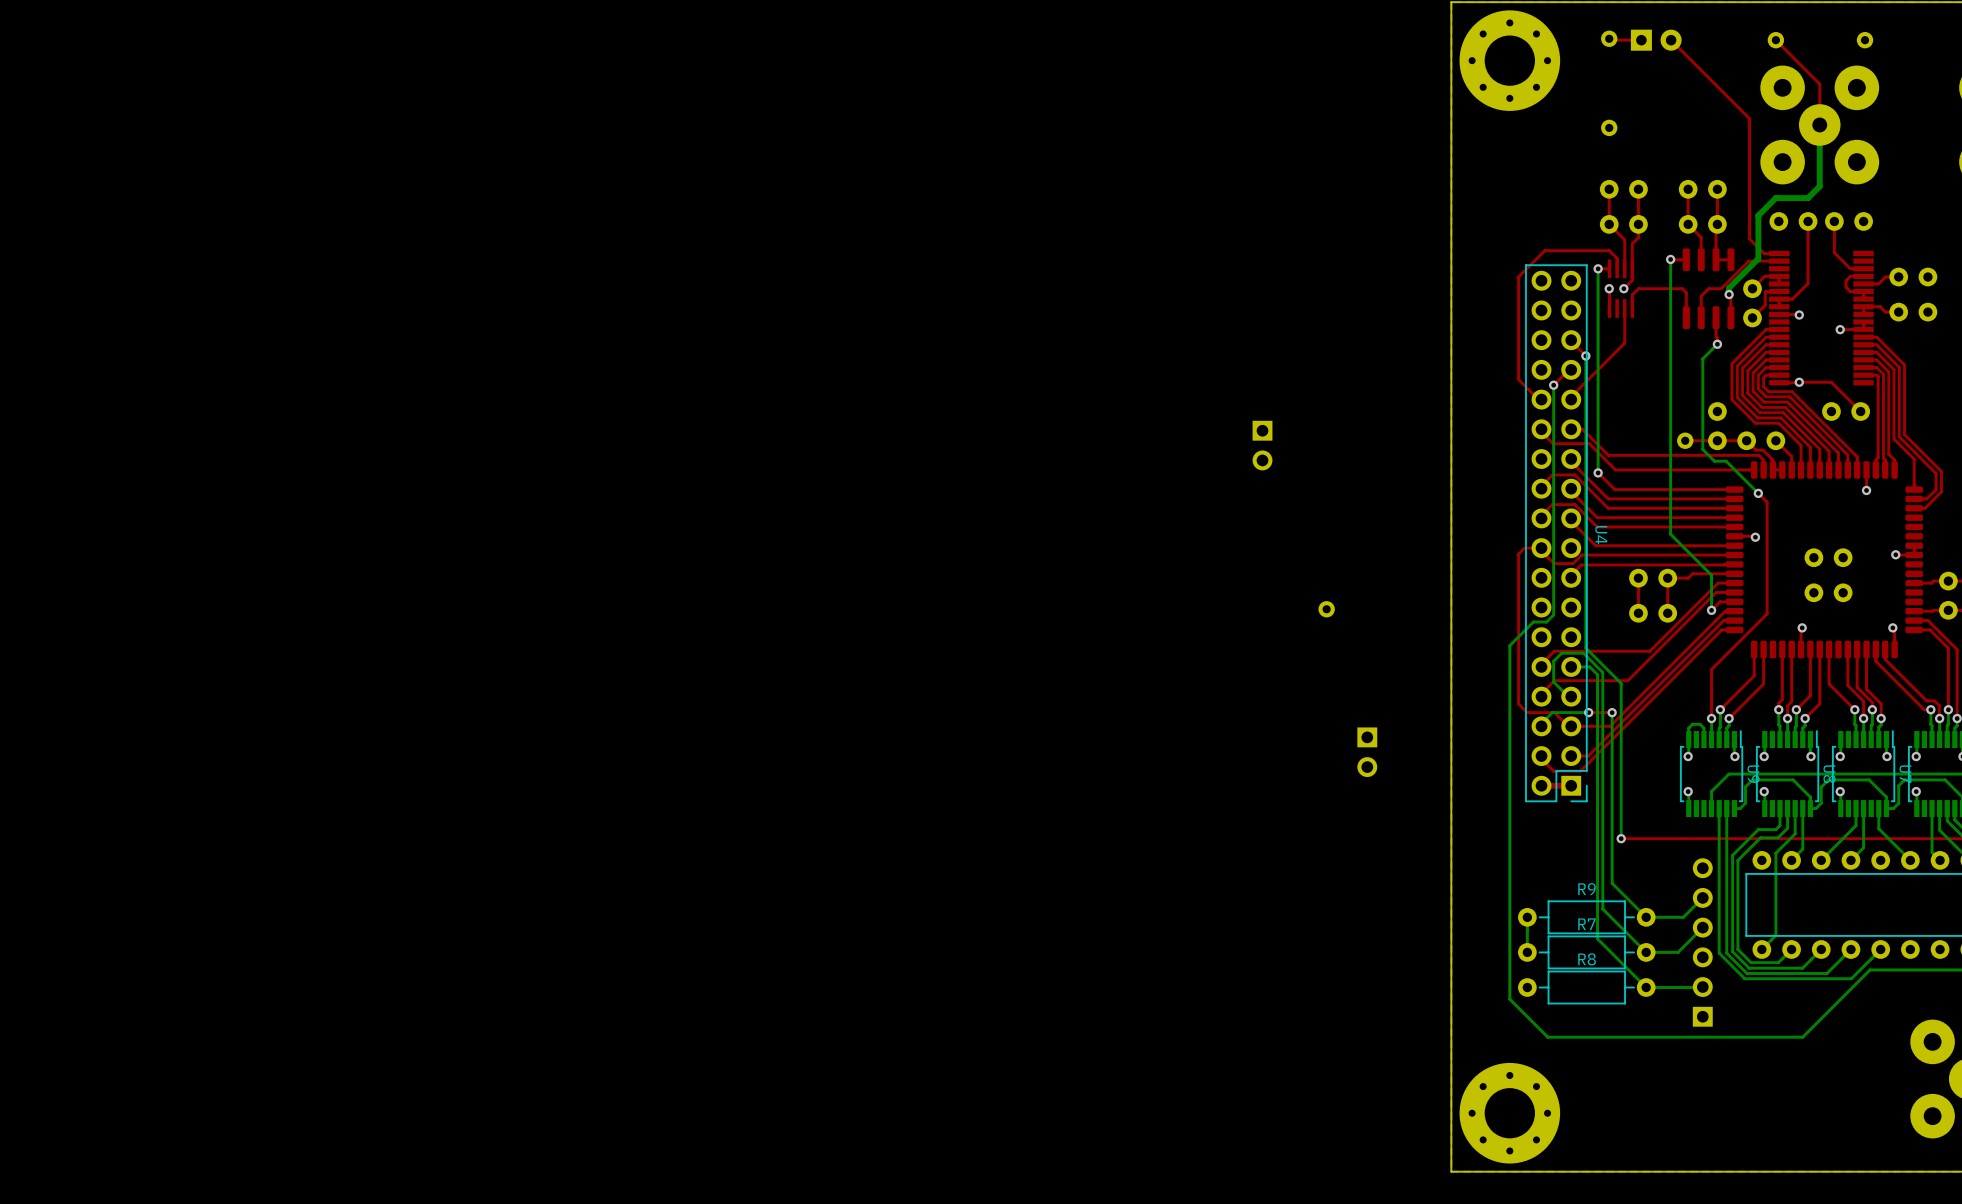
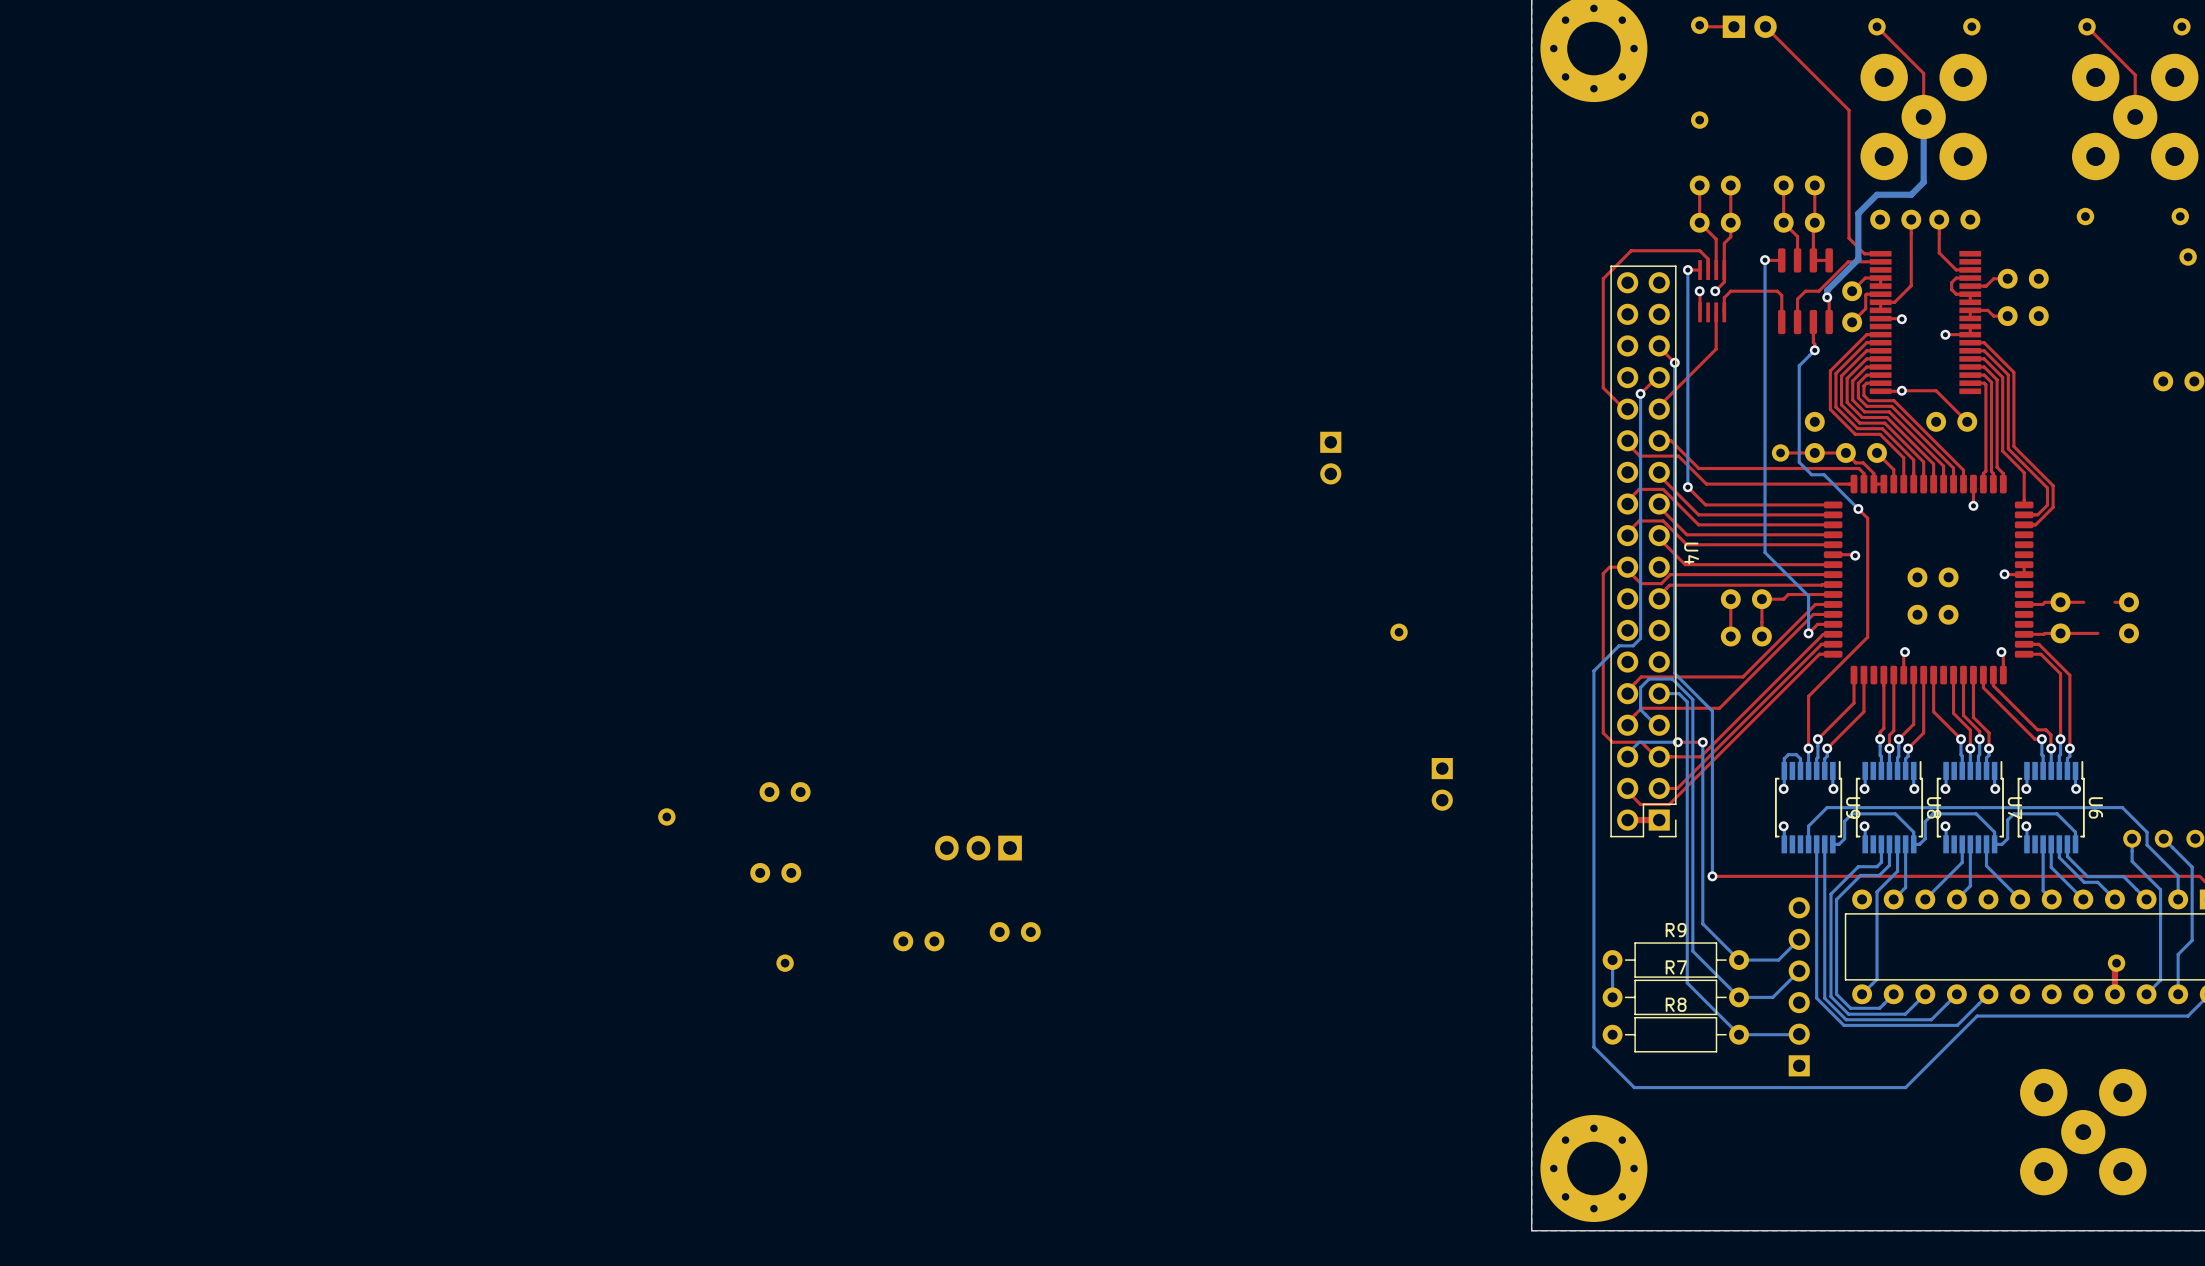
part: none -> (785, 792)
part: none -> (666, 816)
part: none -> (978, 848)
part: none -> (775, 872)
part: none -> (1015, 932)
part: none -> (918, 941)
part: none -> (785, 963)

